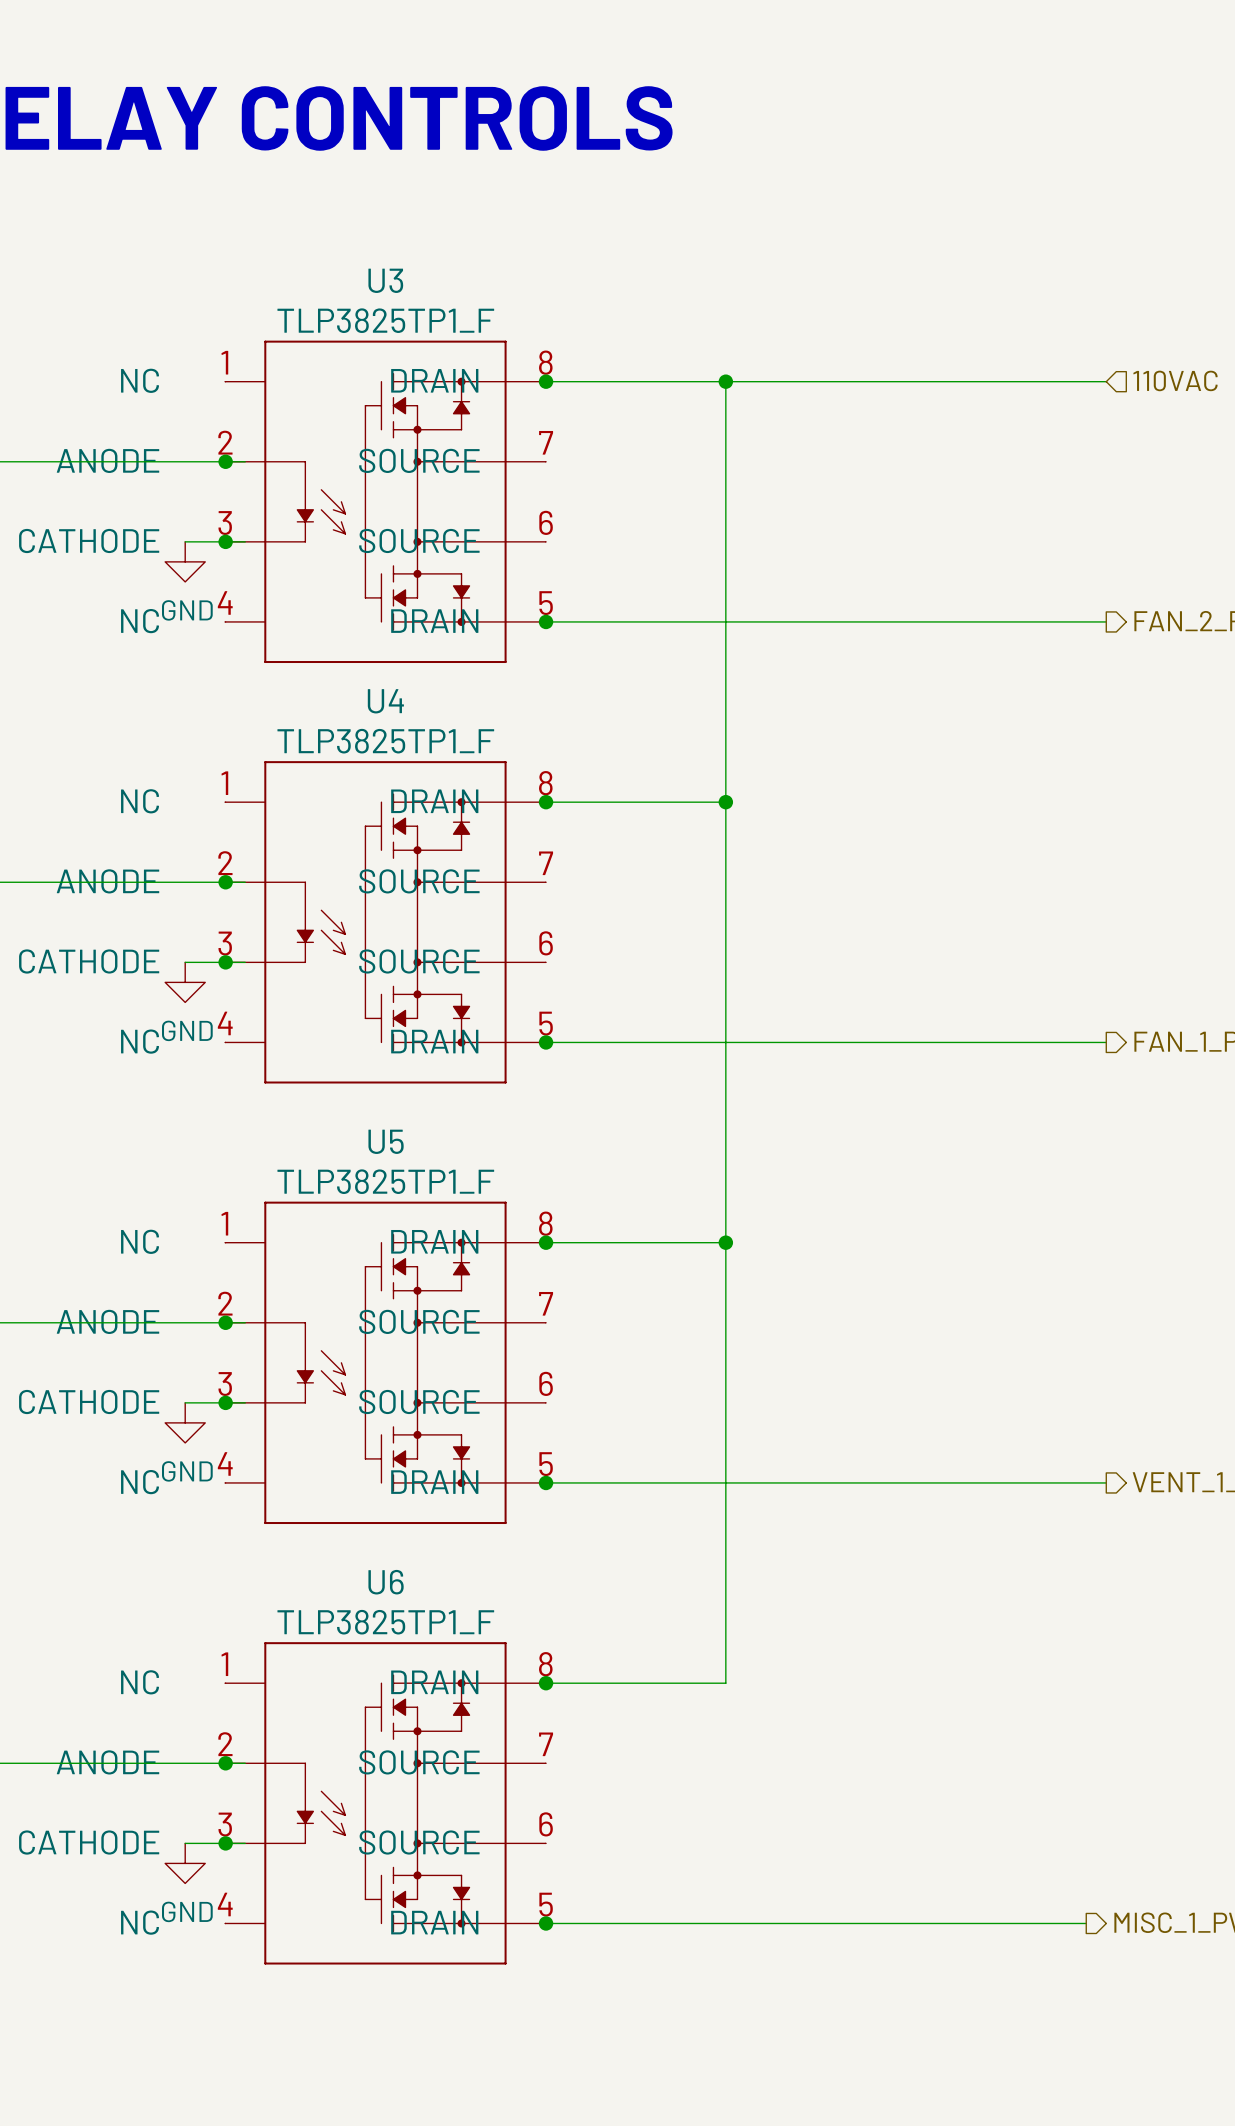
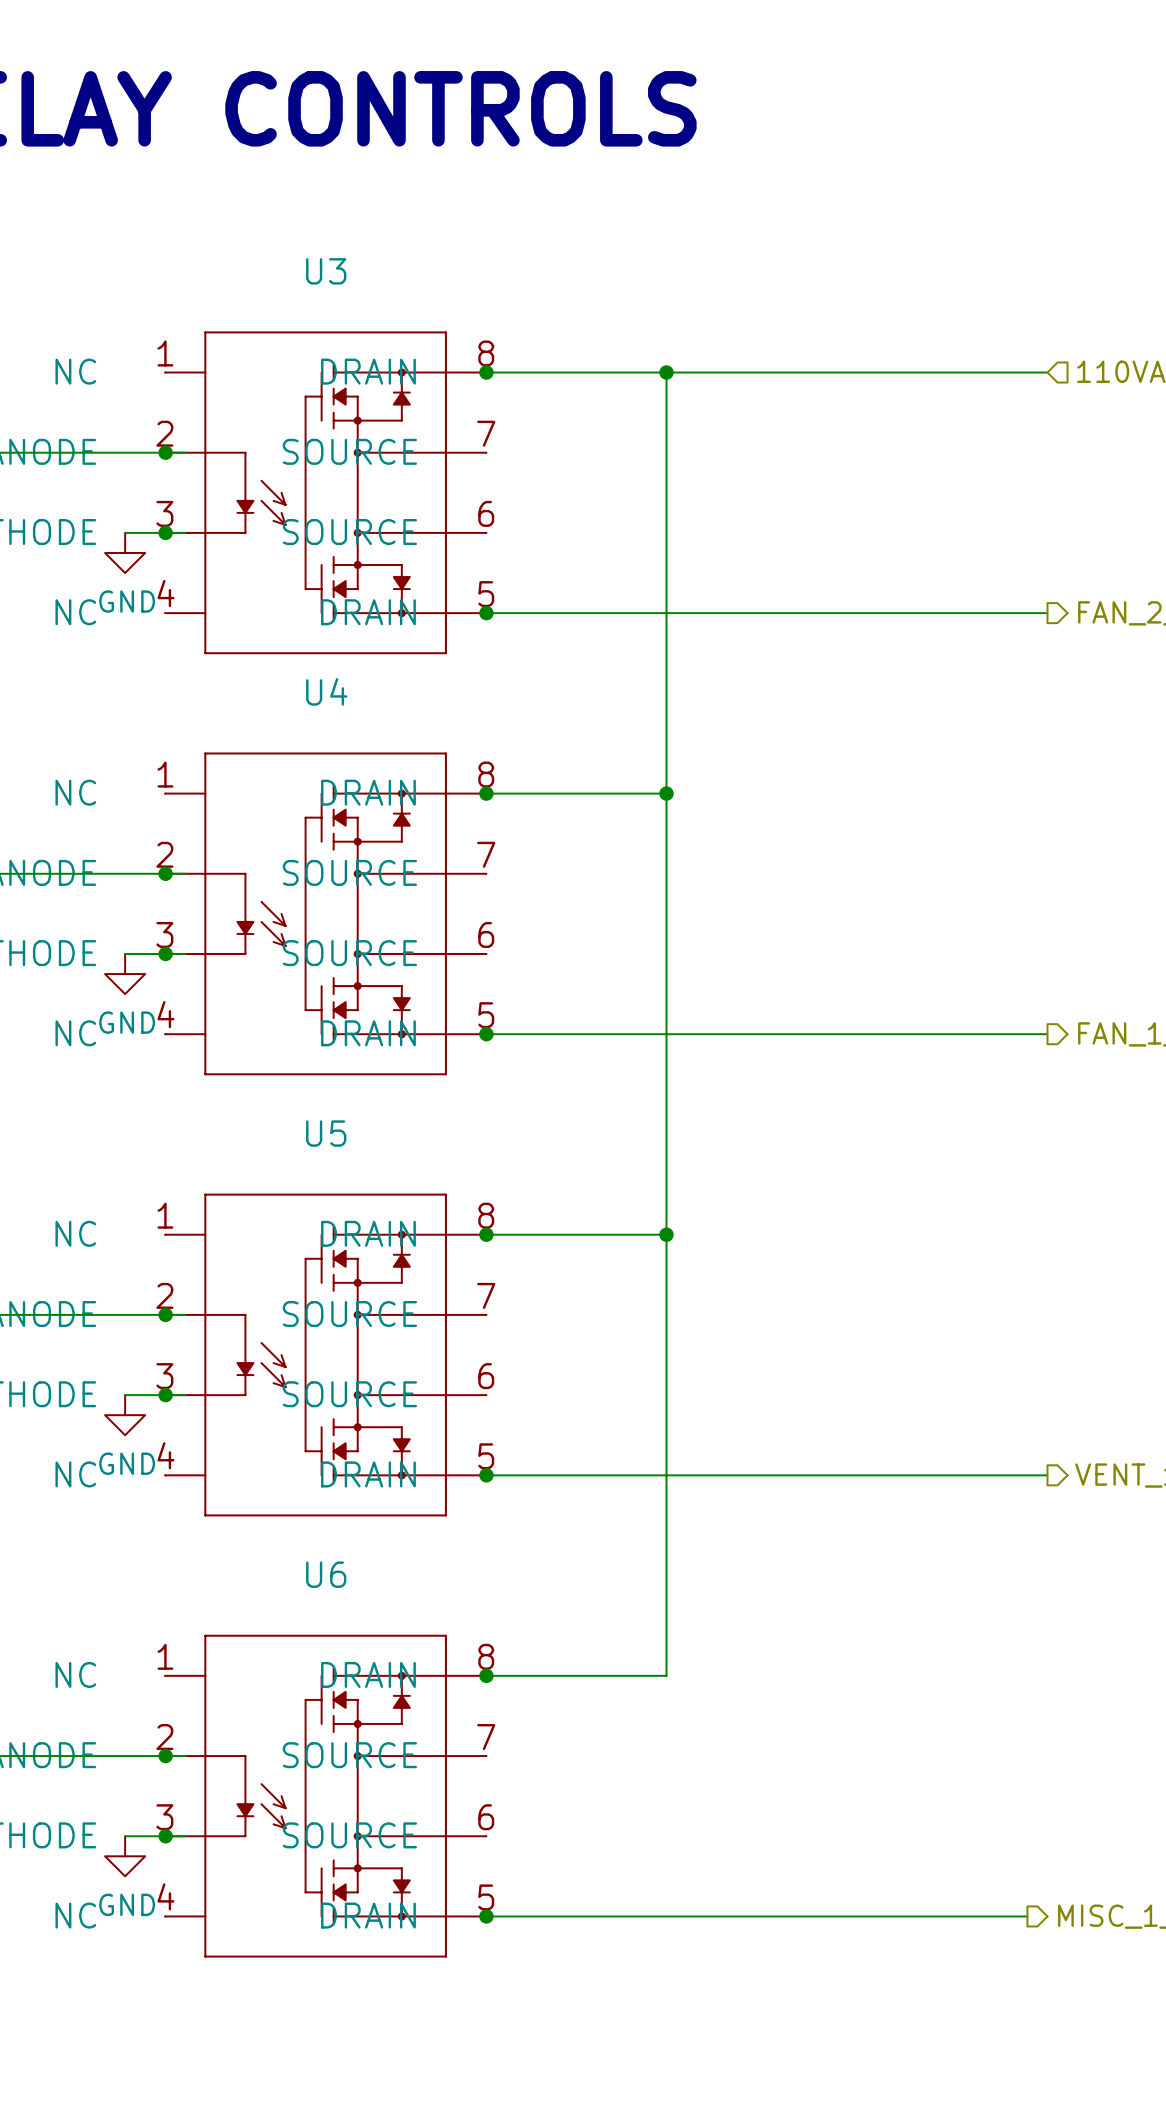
U3 value: TLP3825TP1_F (385, 320) -> none
U4 value: TLP3825TP1_F (385, 741) -> none
U5 value: TLP3825TP1_F (385, 1181) -> none
U6 value: TLP3825TP1_F (385, 1622) -> none

